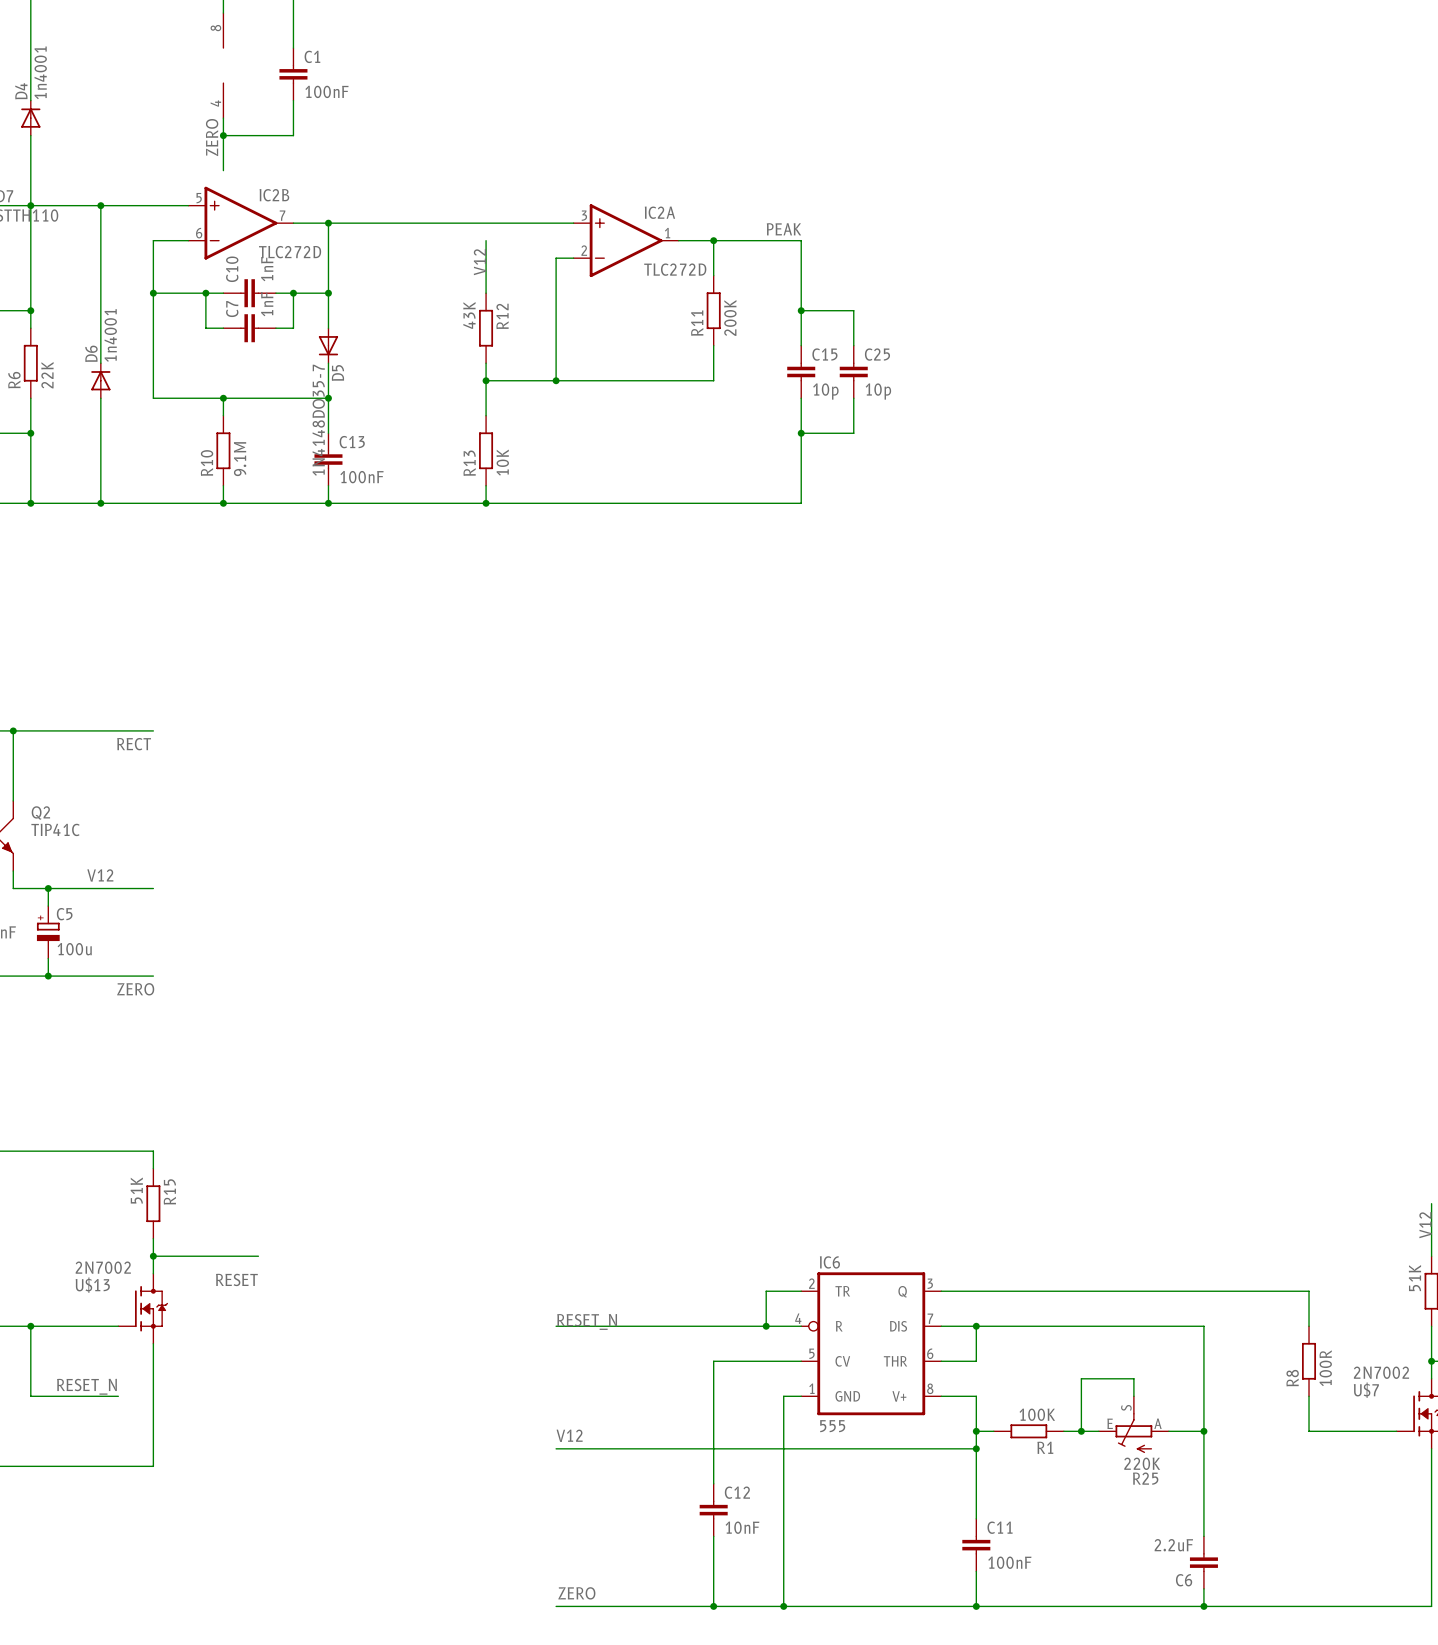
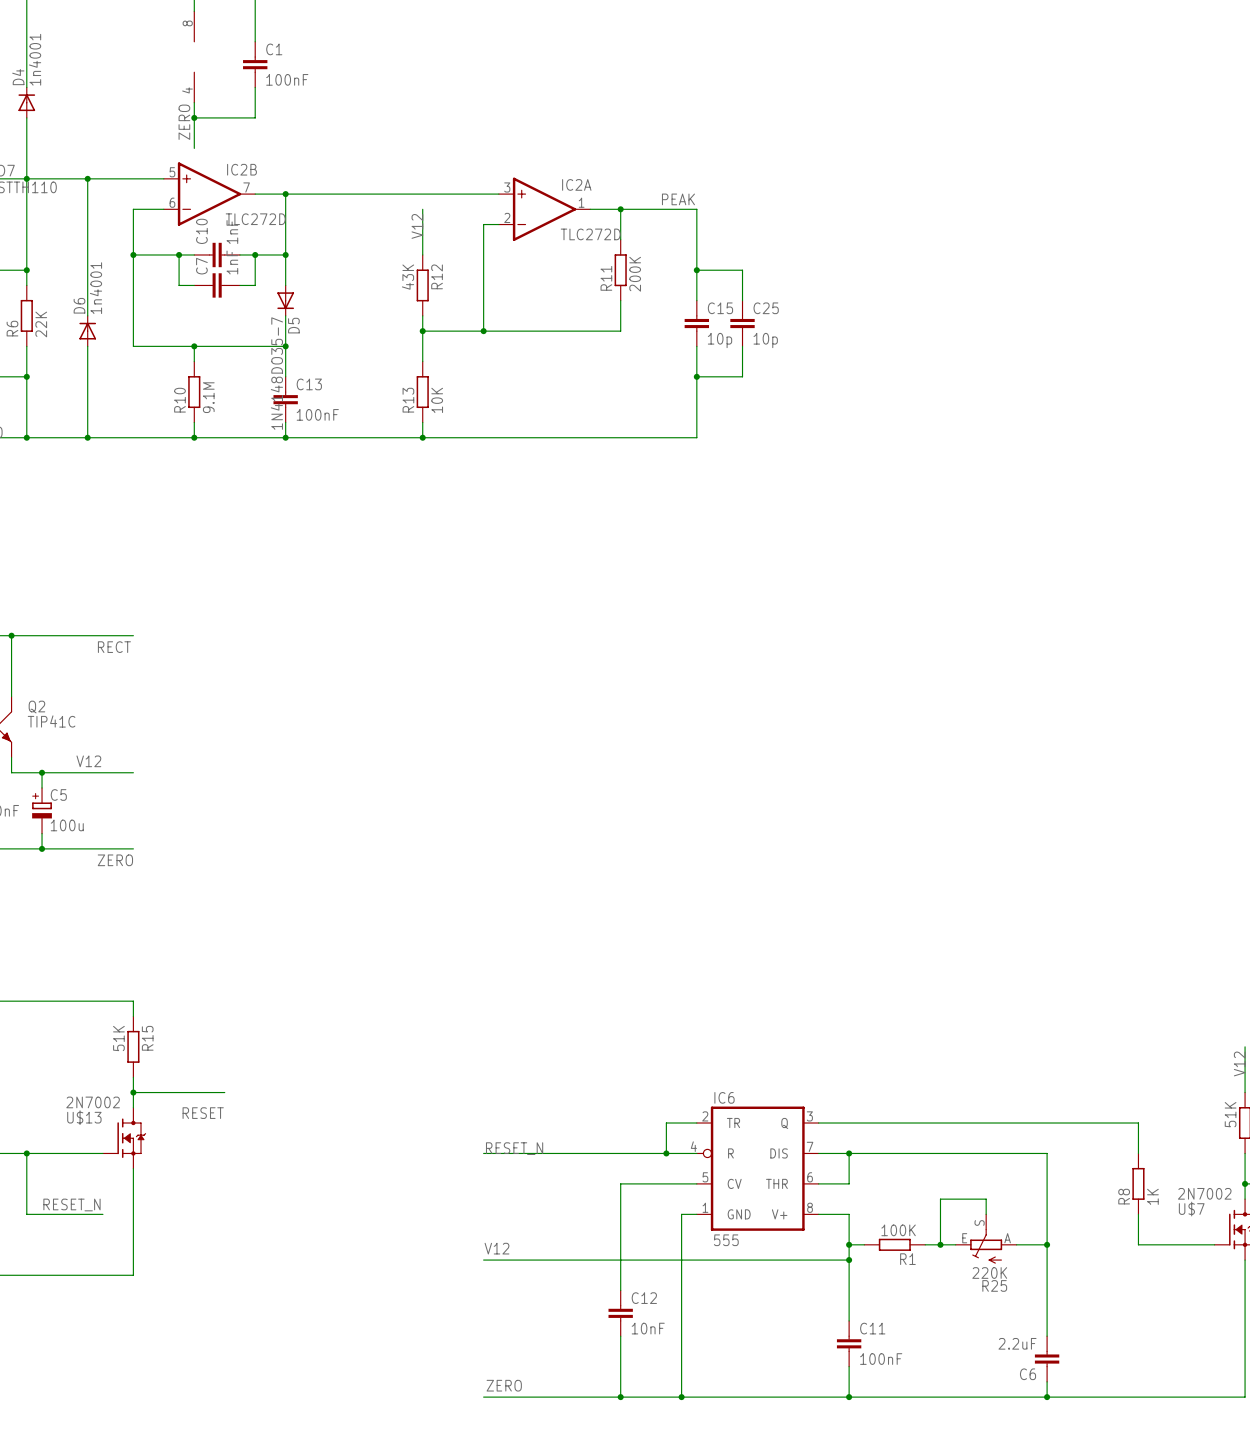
R8 value: 100R (1325, 1368) -> 1K (1152, 1196)

